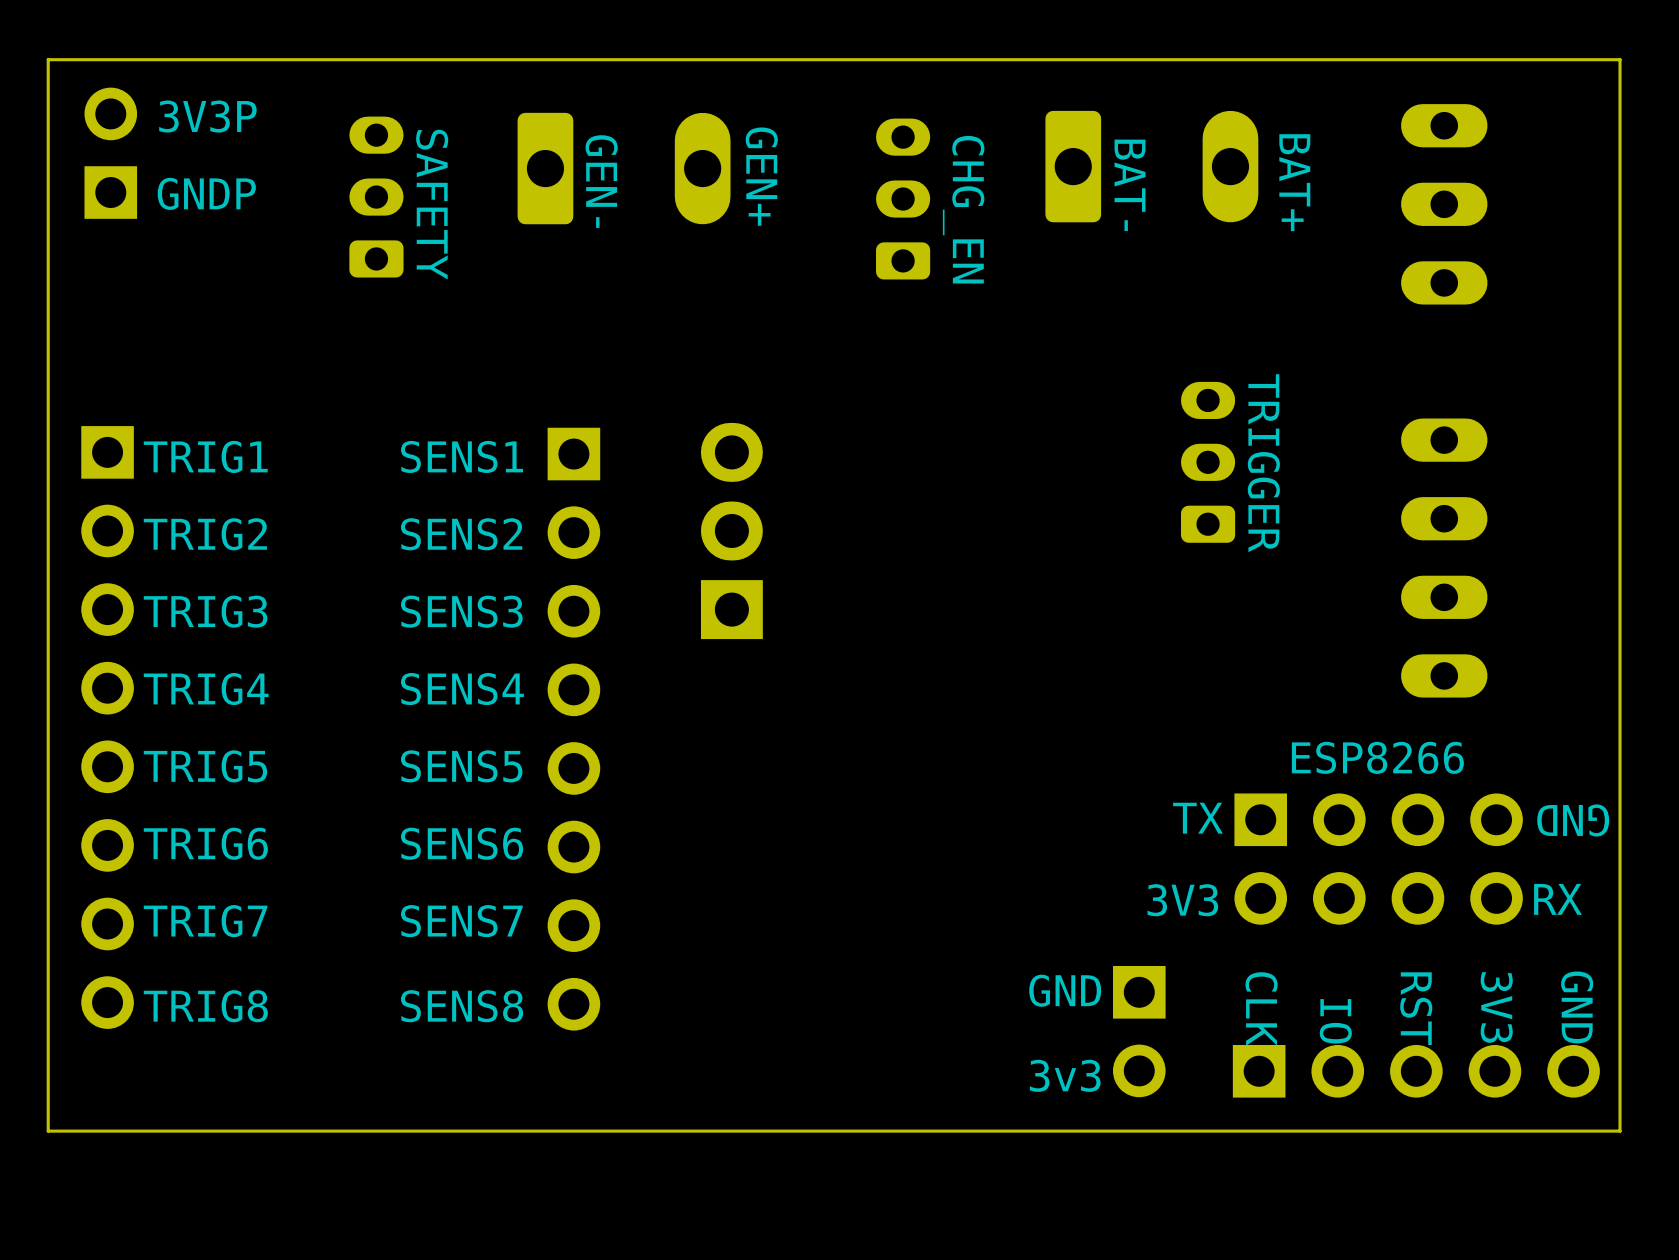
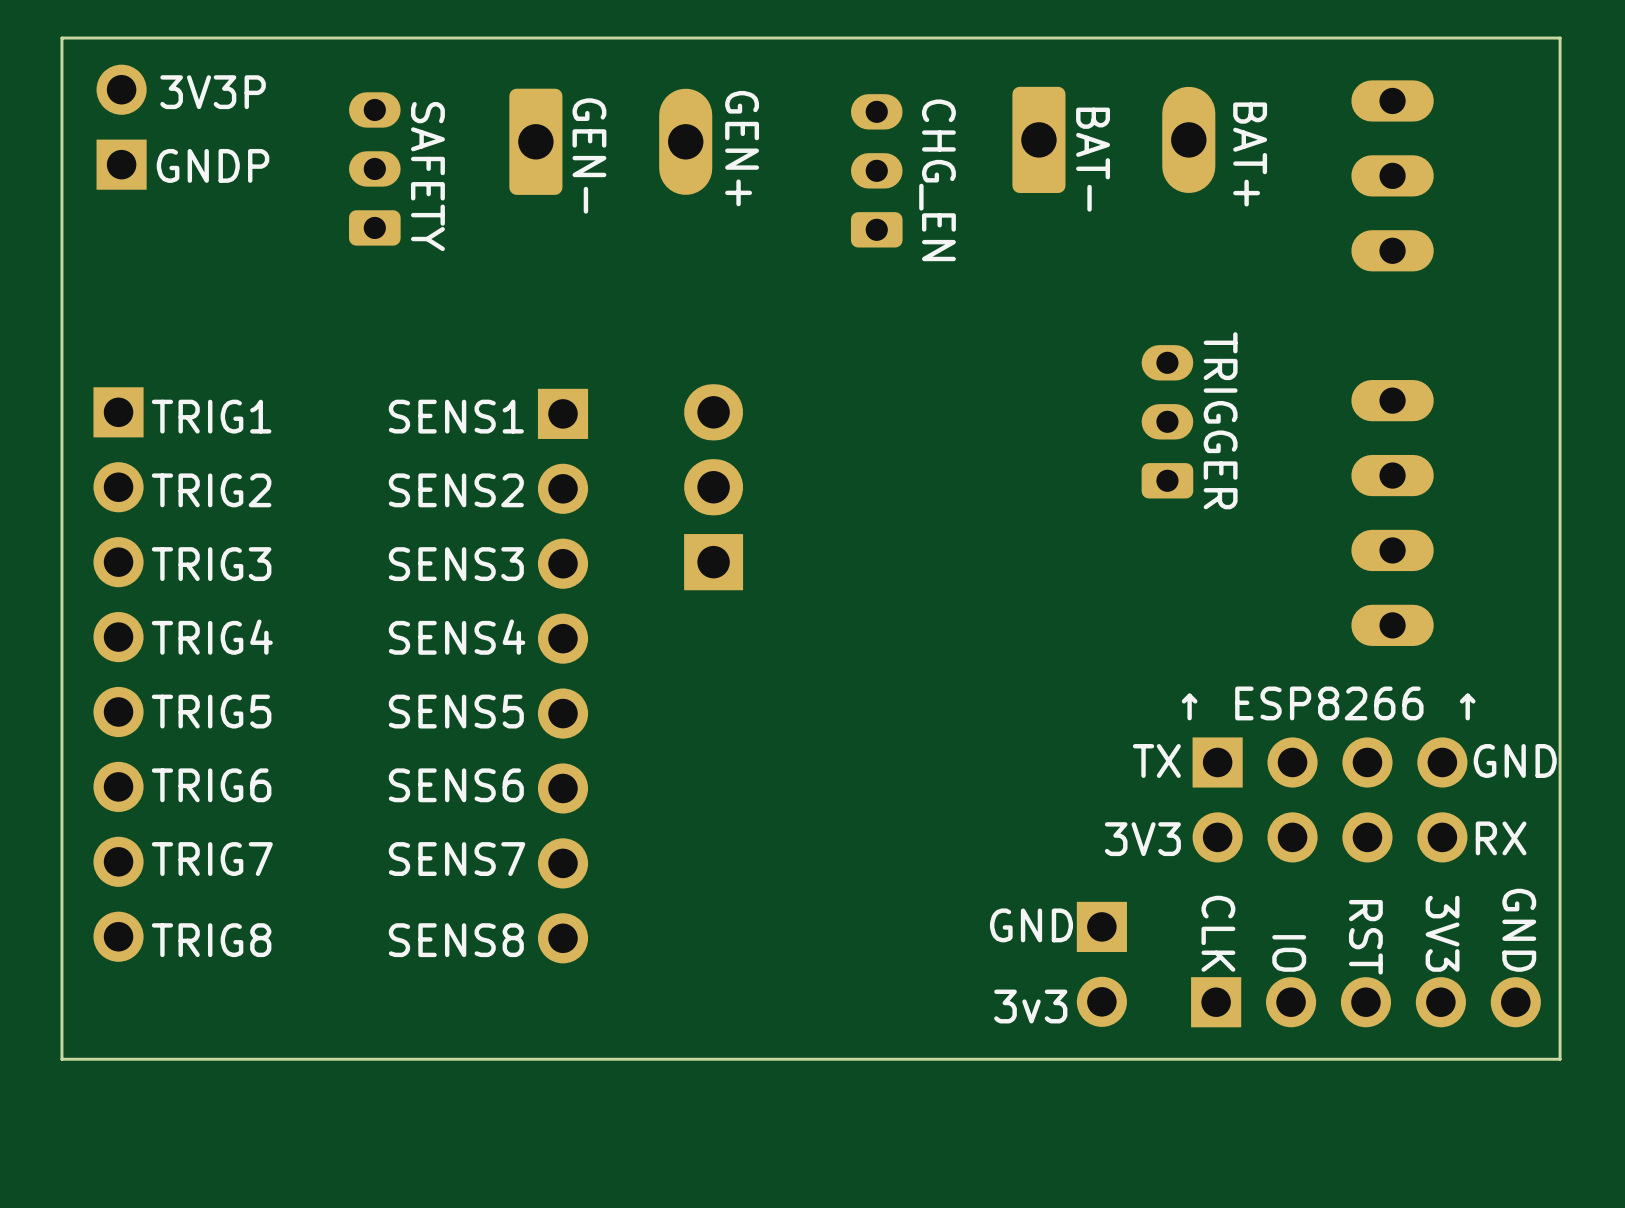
text: ESP8266 (1377, 757) -> ↑ ESP8266 ↑ (1328, 703)
text rotation: 0° (1573, 820) -> 180° (1515, 760)

